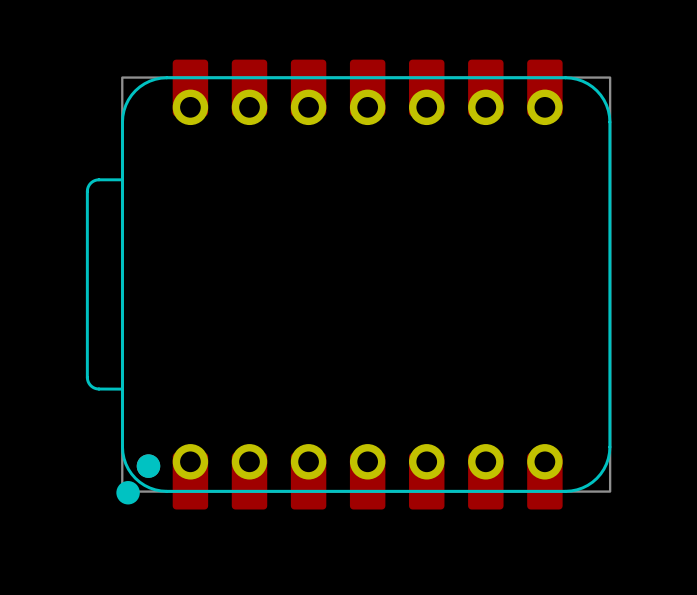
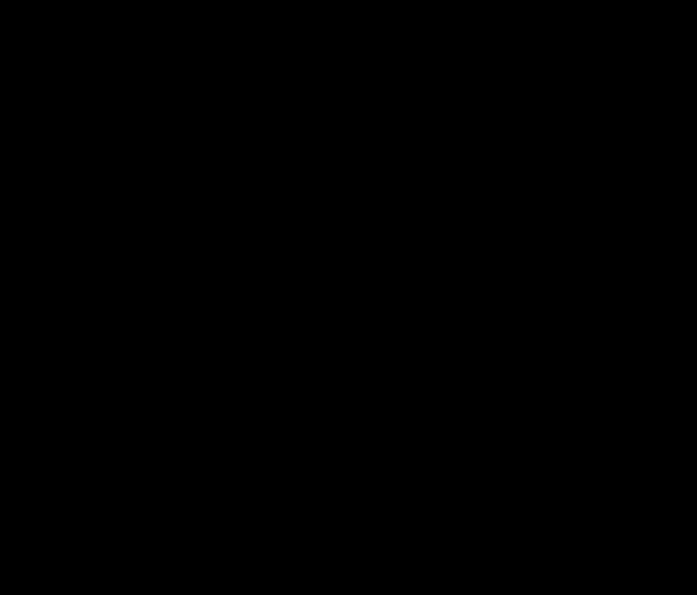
part: (348, 284) -> none

